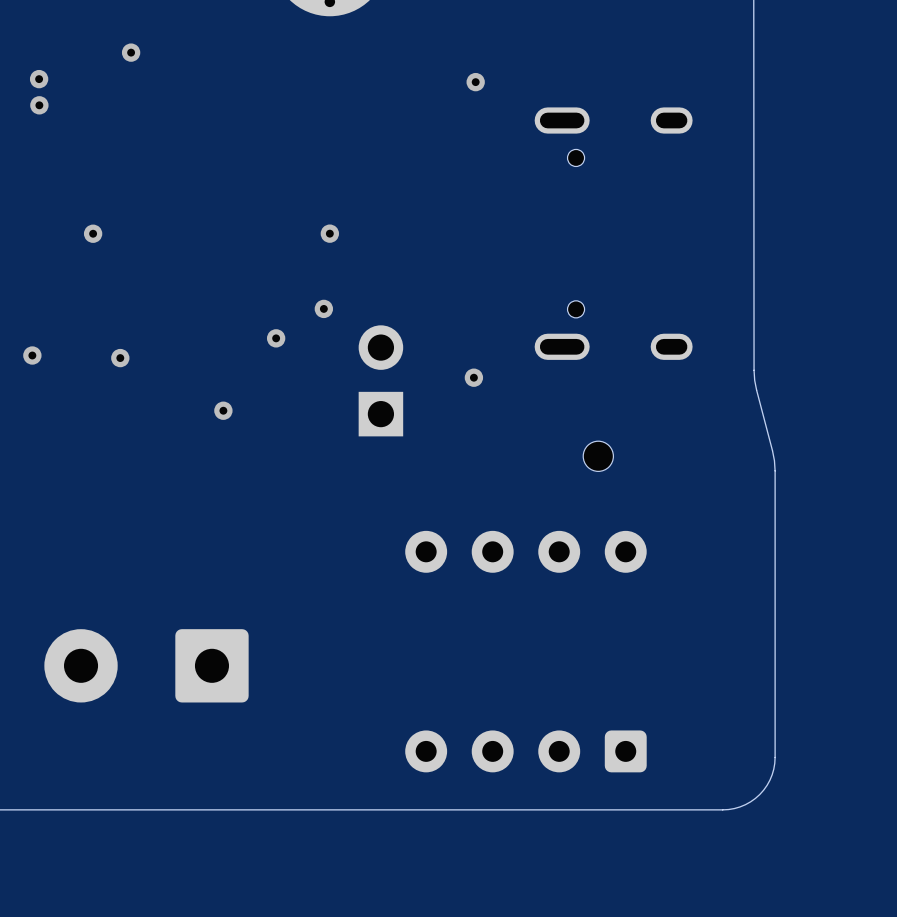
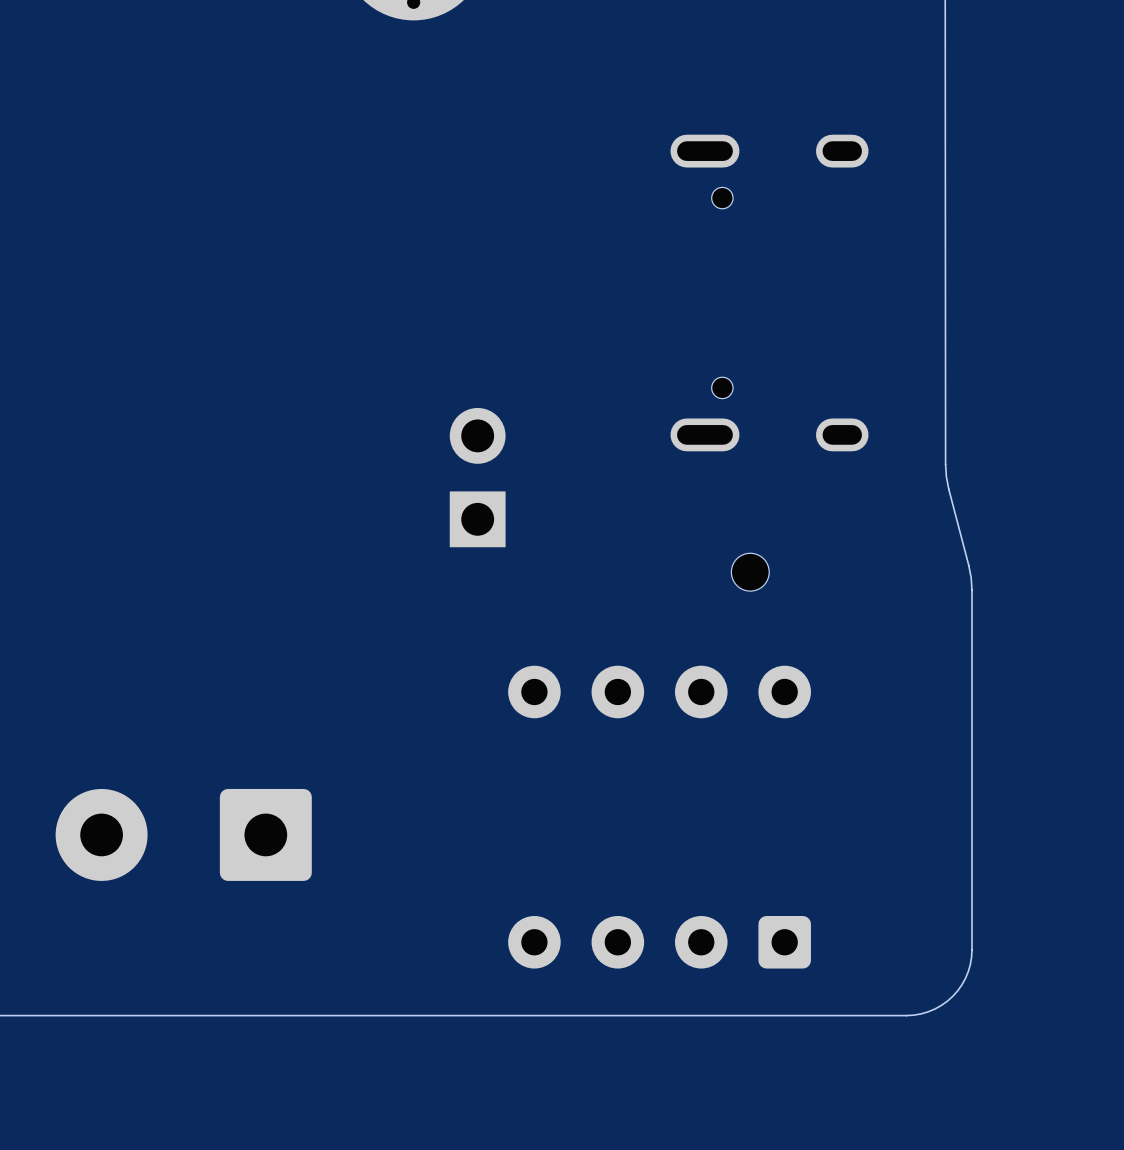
via: (131, 52) -> none
via: (39, 79) -> none
via: (475, 82) -> none
via: (39, 105) -> none
via: (93, 233) -> none
via: (329, 233) -> none
via: (323, 308) -> none
via: (276, 338) -> none
via: (32, 355) -> none
via: (120, 358) -> none
via: (473, 377) -> none
via: (223, 410) -> none

